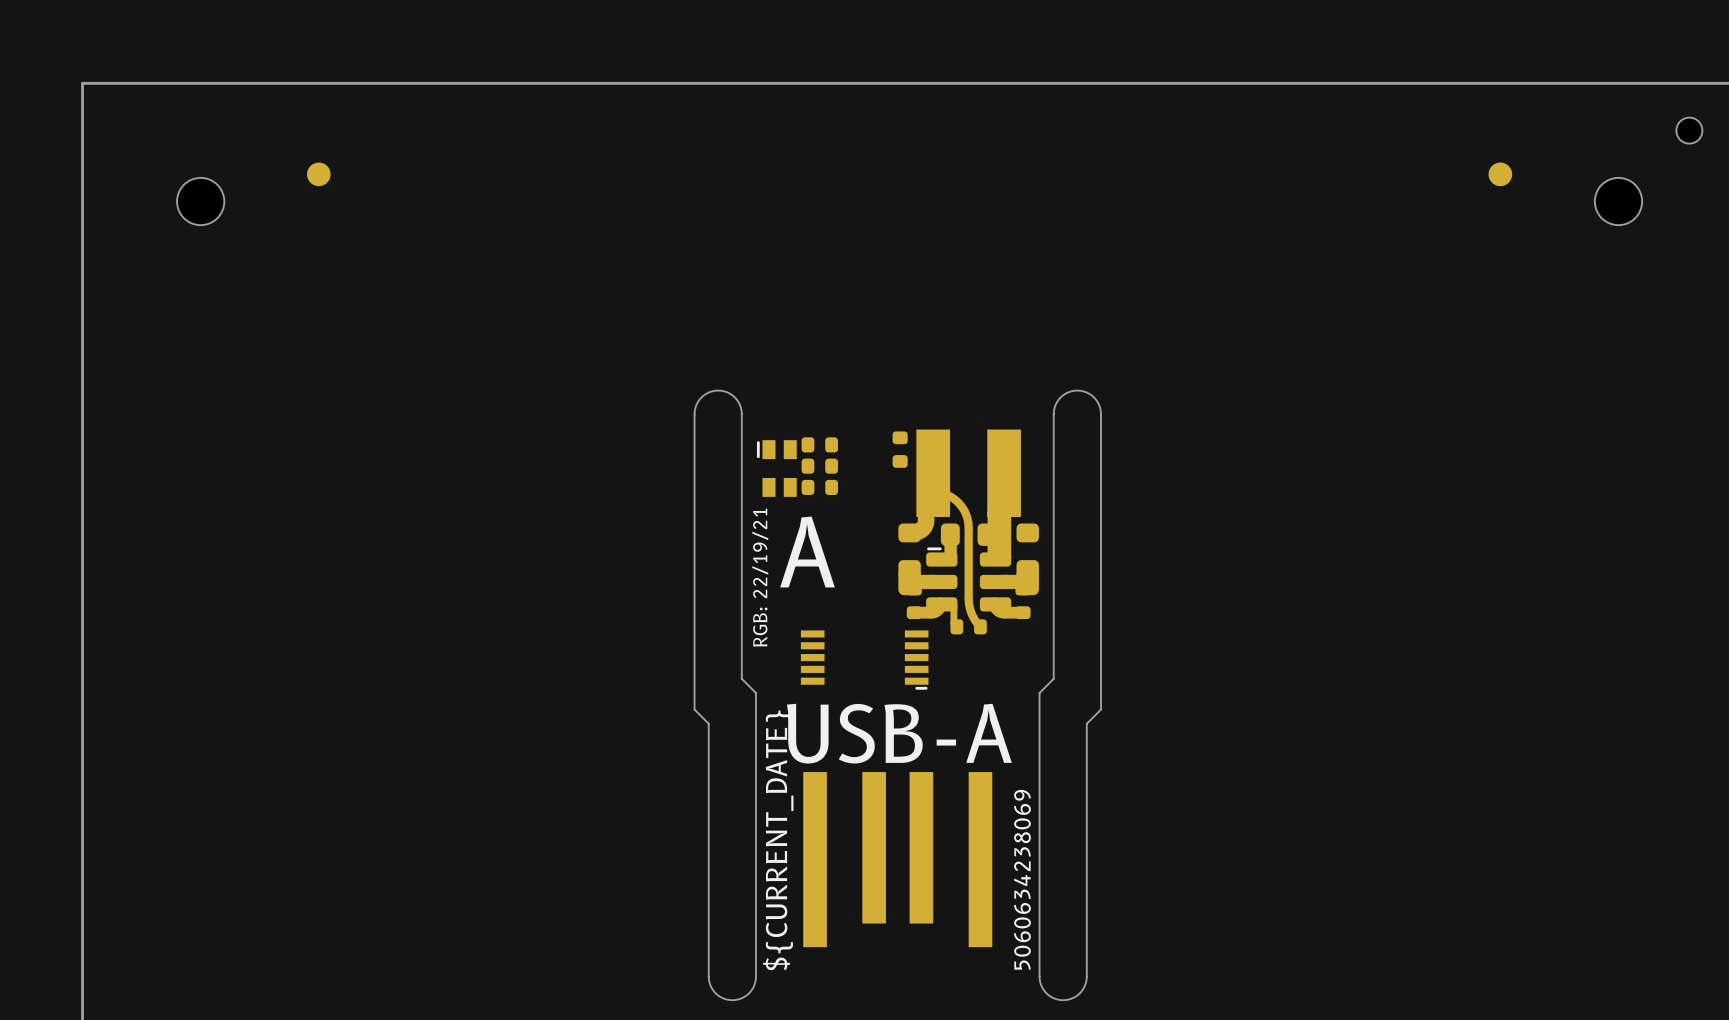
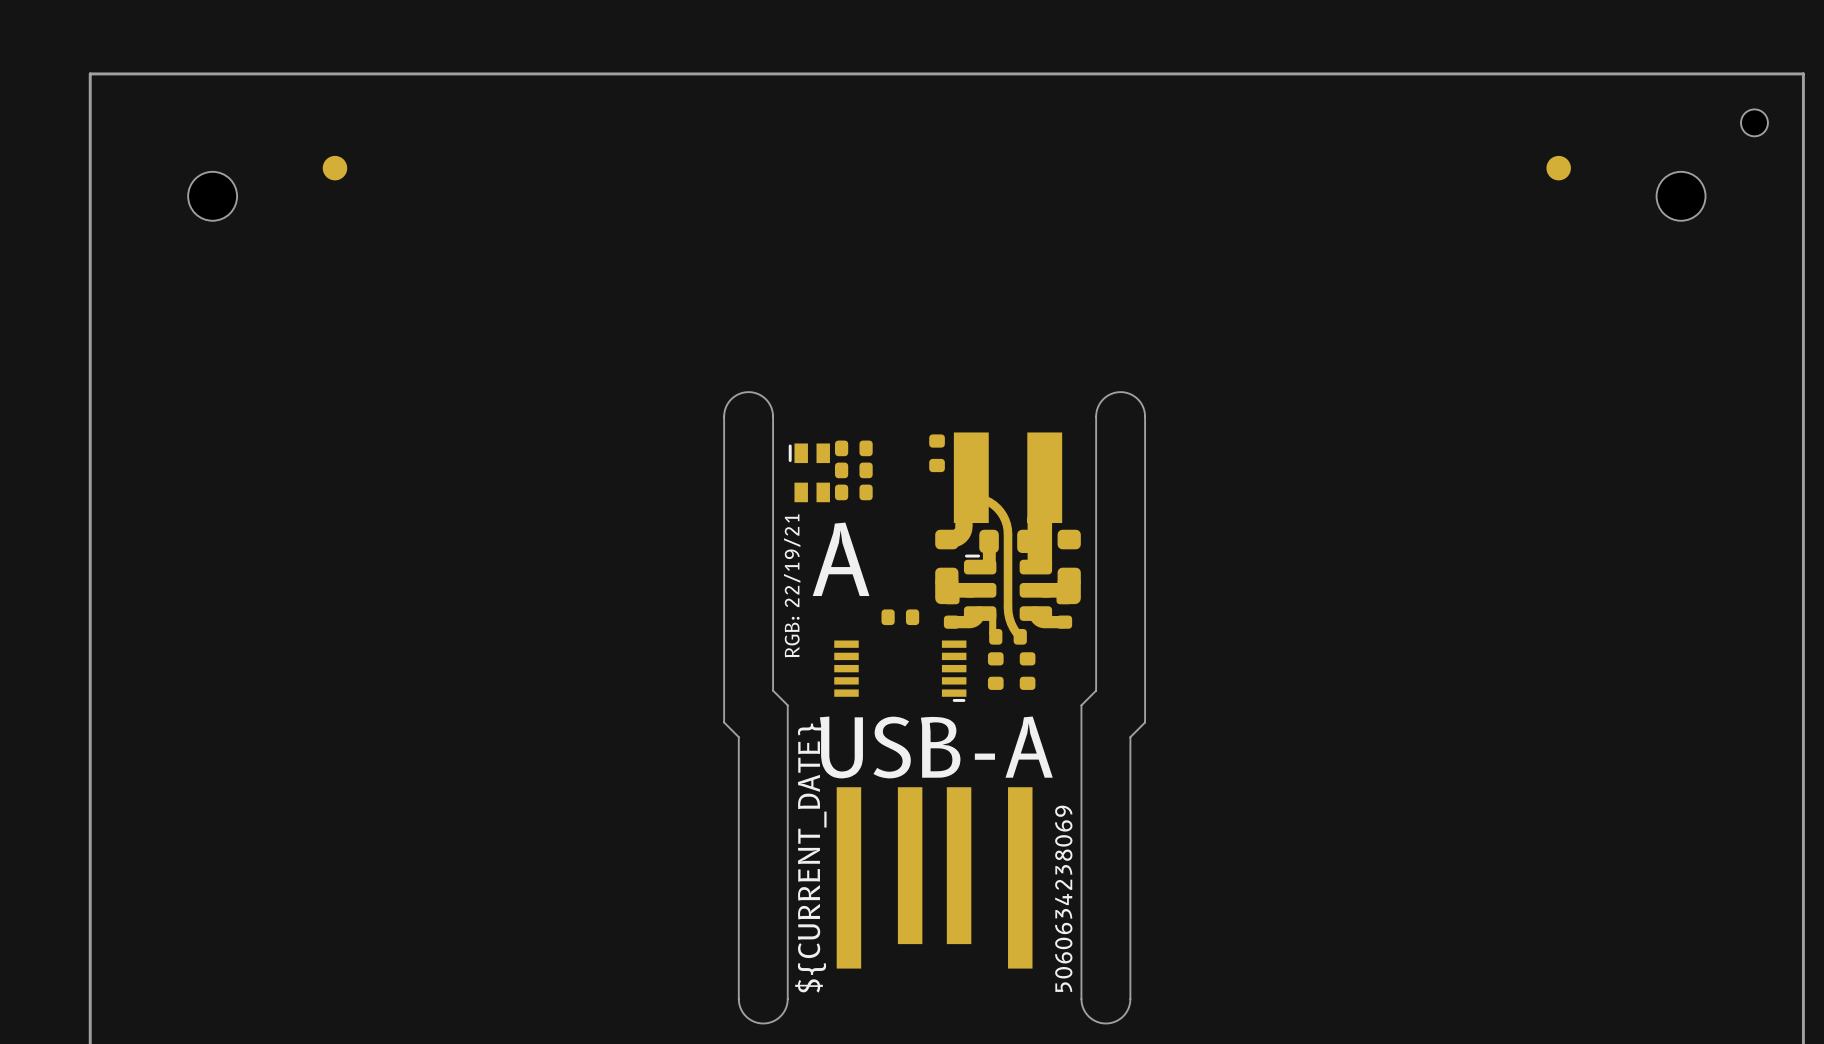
part: none -> (900, 617)
part: none -> (995, 671)
part: none -> (1027, 671)

